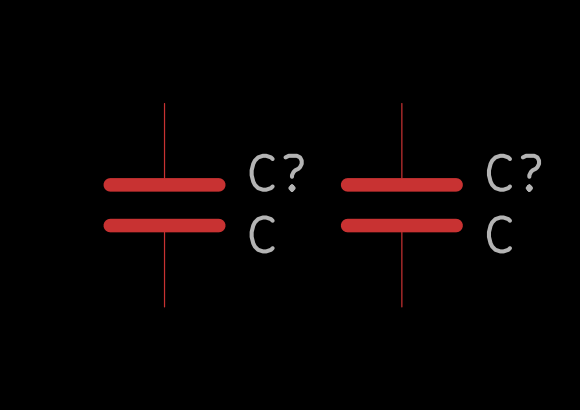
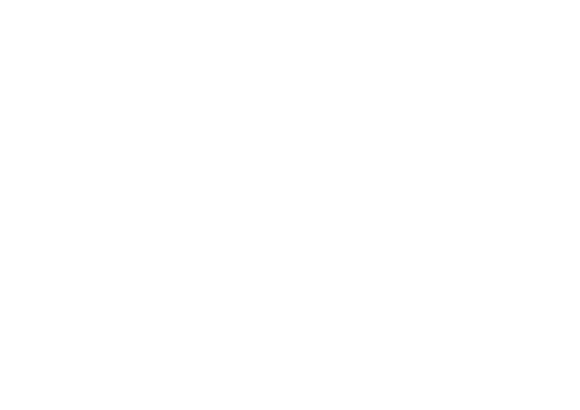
C?: C (164, 205) -> none
C?: C (401, 205) -> none

